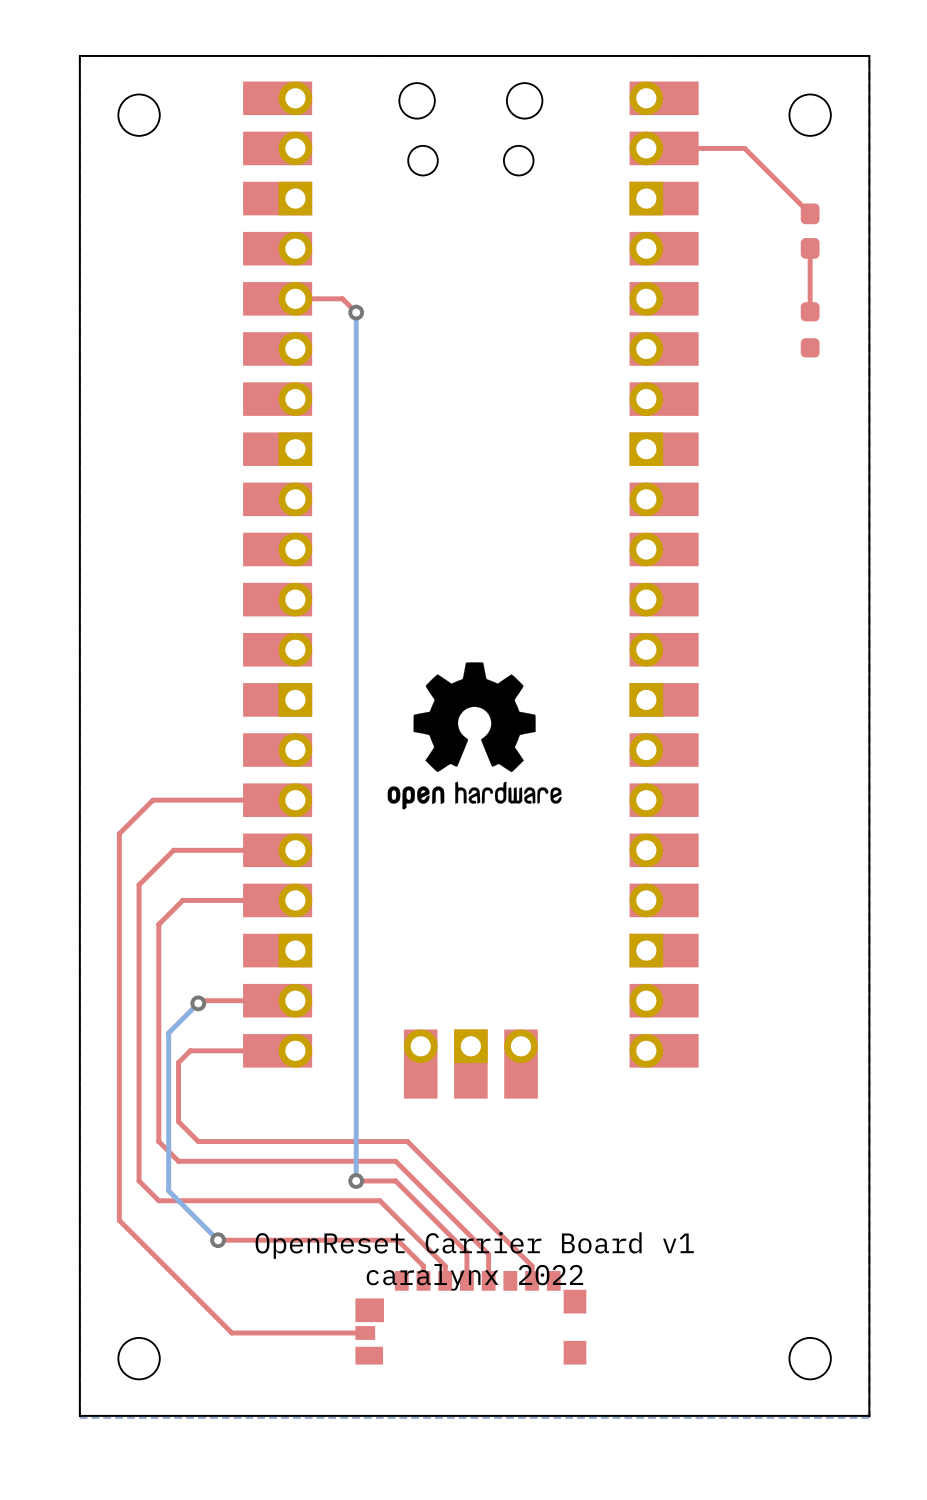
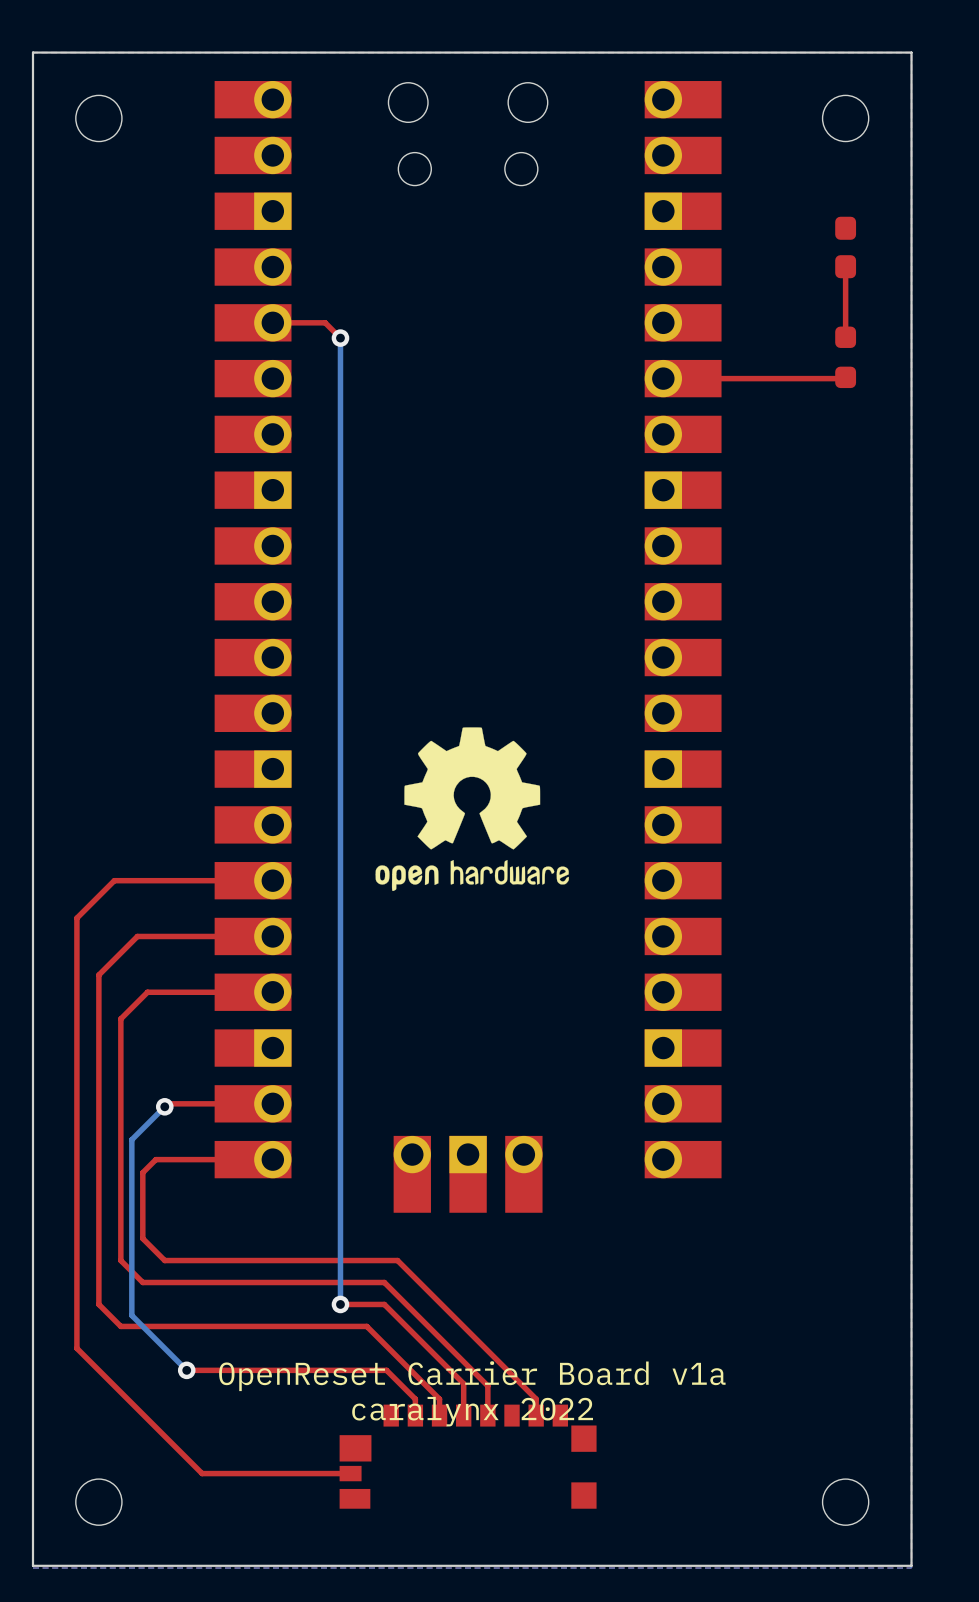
top track: (646, 148) (744, 148) (810, 213) -> none
top track: none -> (845, 378) (663, 378)
text: OpenReset Carrier Board v1 (474, 1245) -> OpenReset Carrier Board v1a (472, 1376)

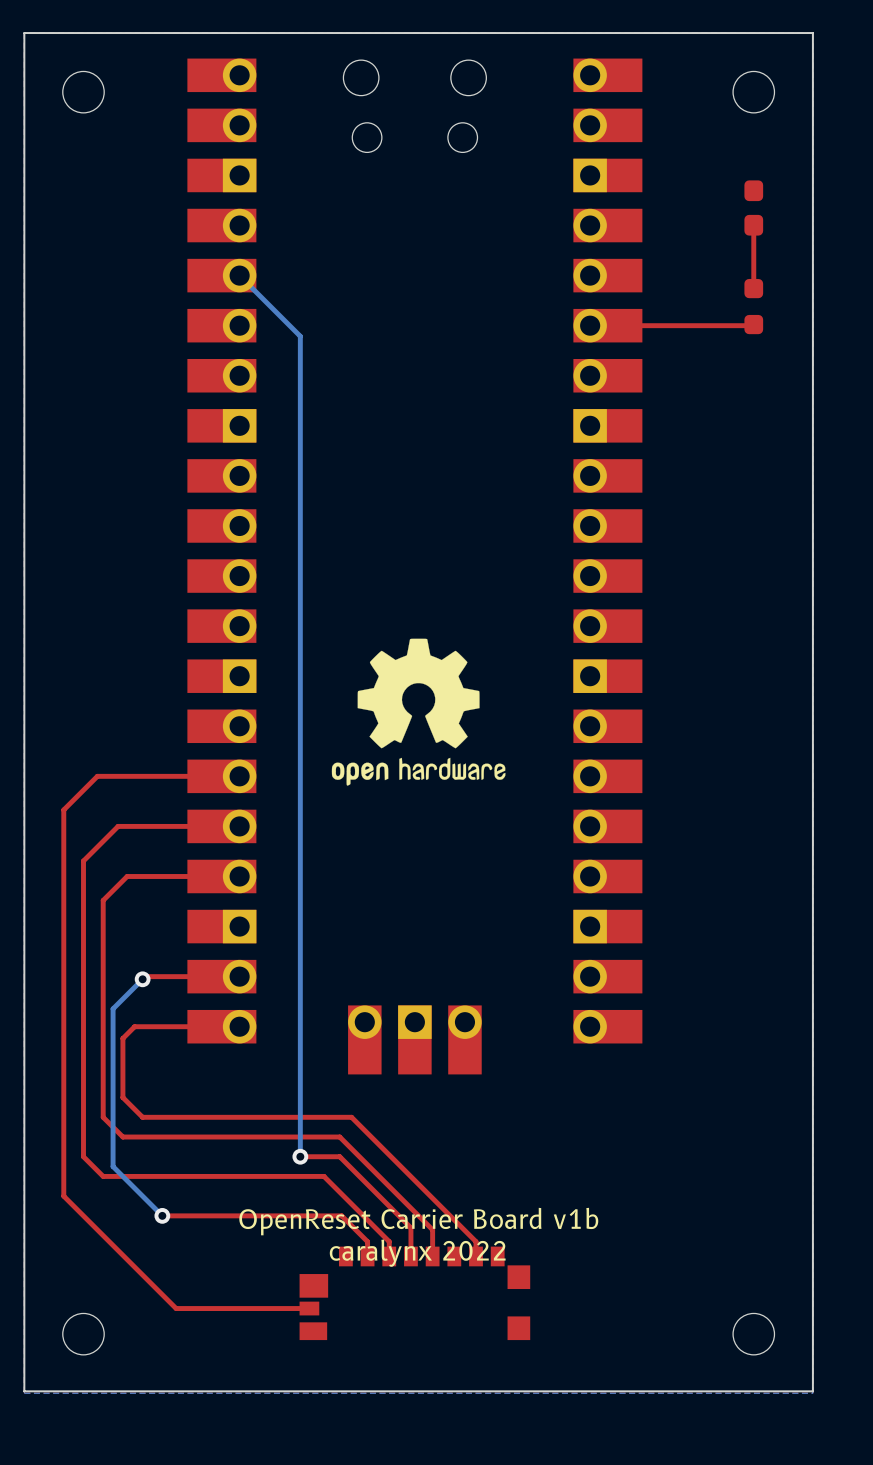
top track: (272, 322) (325, 322) (340, 338) -> none
bottom track: (340, 338) (340, 390) -> (239, 275) (300, 336)
via: (340, 338) -> none
text: OpenReset Carrier Board v1a (472, 1376) -> OpenReset Carrier Board v1b (418, 1221)

